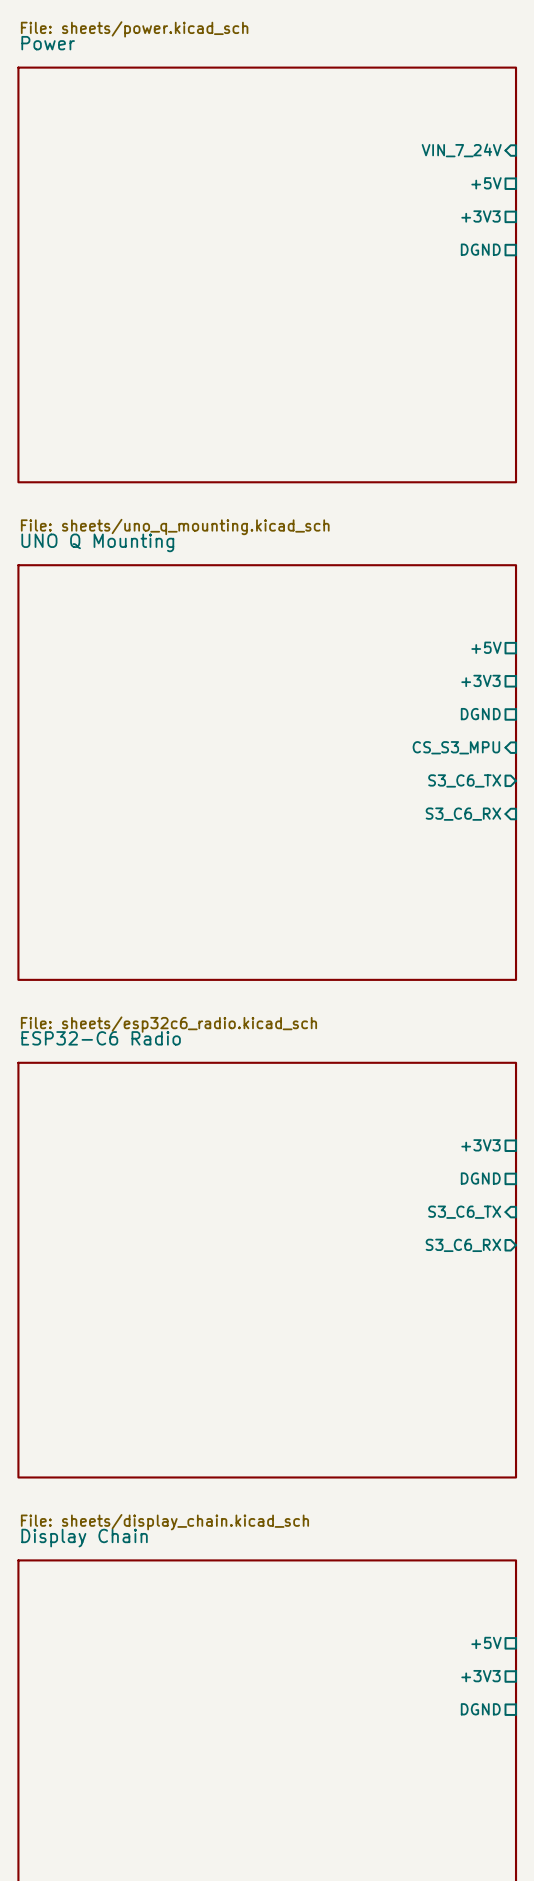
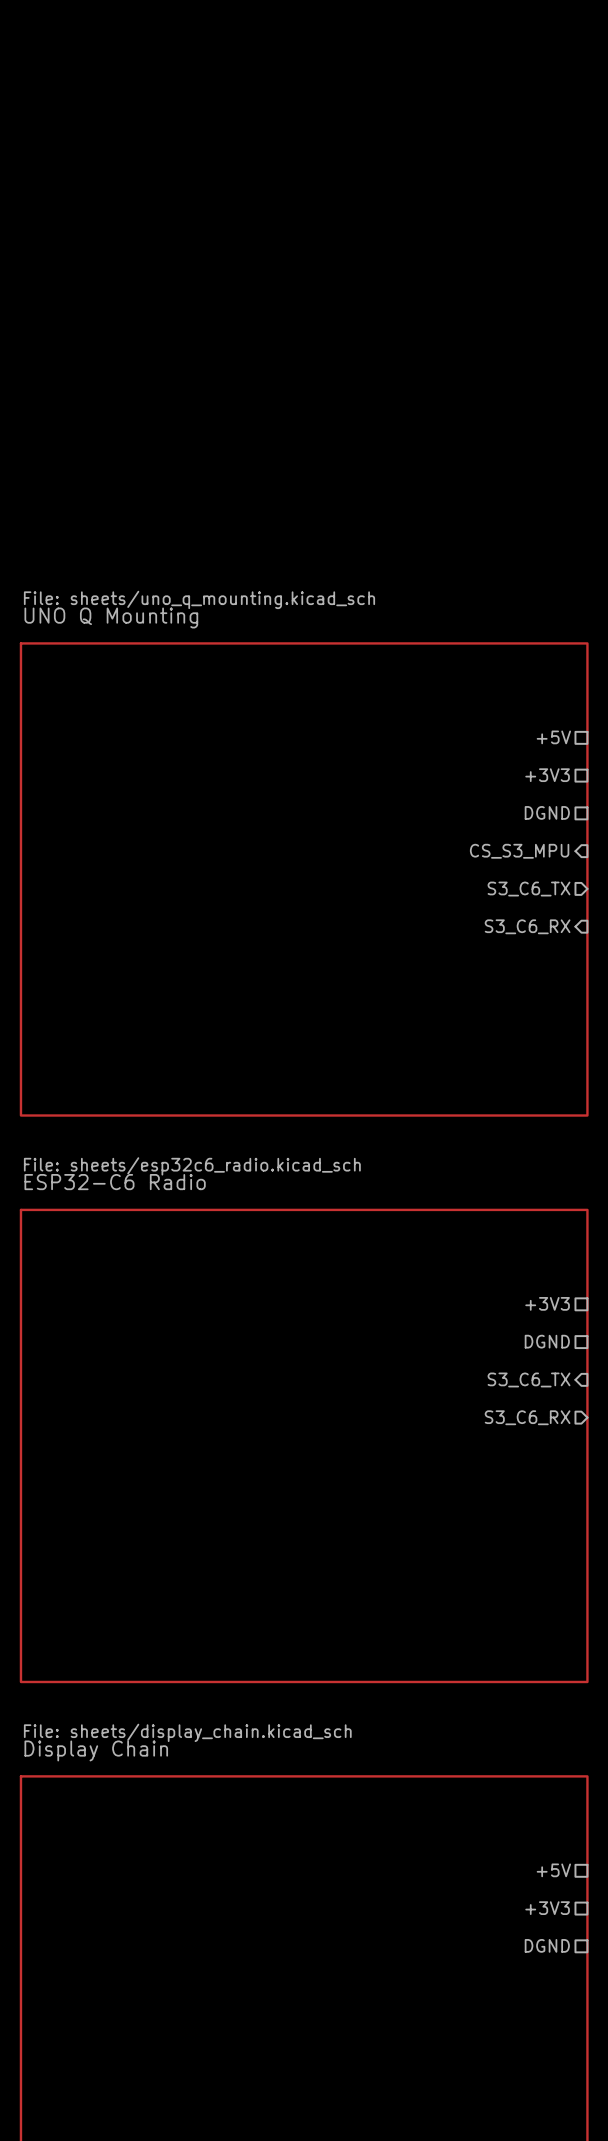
sheet pin: VIN_7_24V (461, 150) -> none
sheet pin: +5V (486, 183) -> none
sheet pin: +3V3 (481, 216) -> none
sheet pin: DGND (480, 249) -> none
sheet Power: File: sheets/power.kicad_sch (267, 274) -> none

